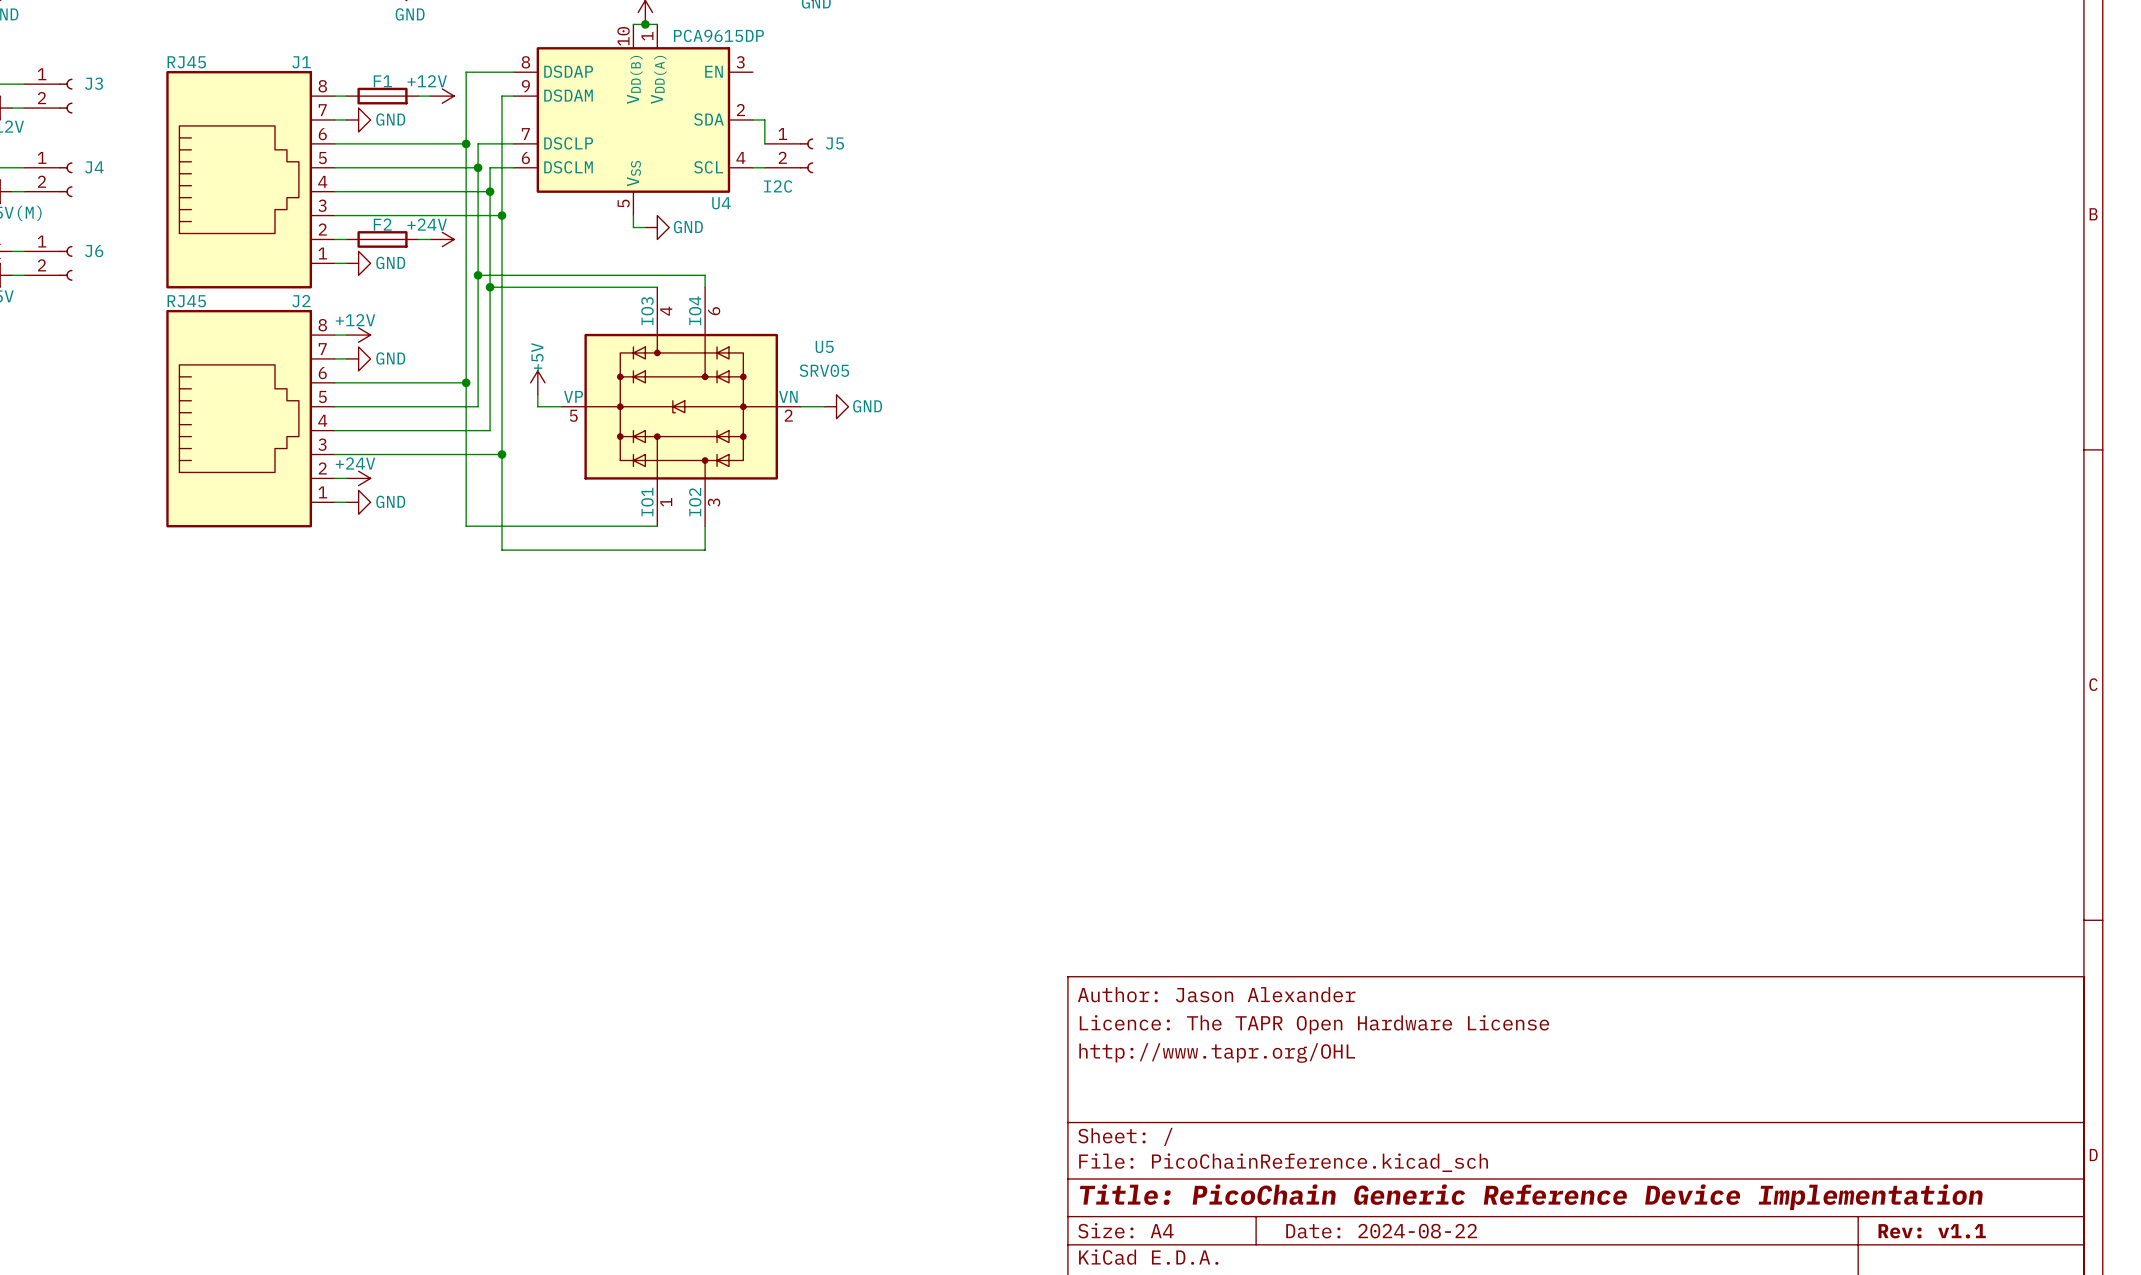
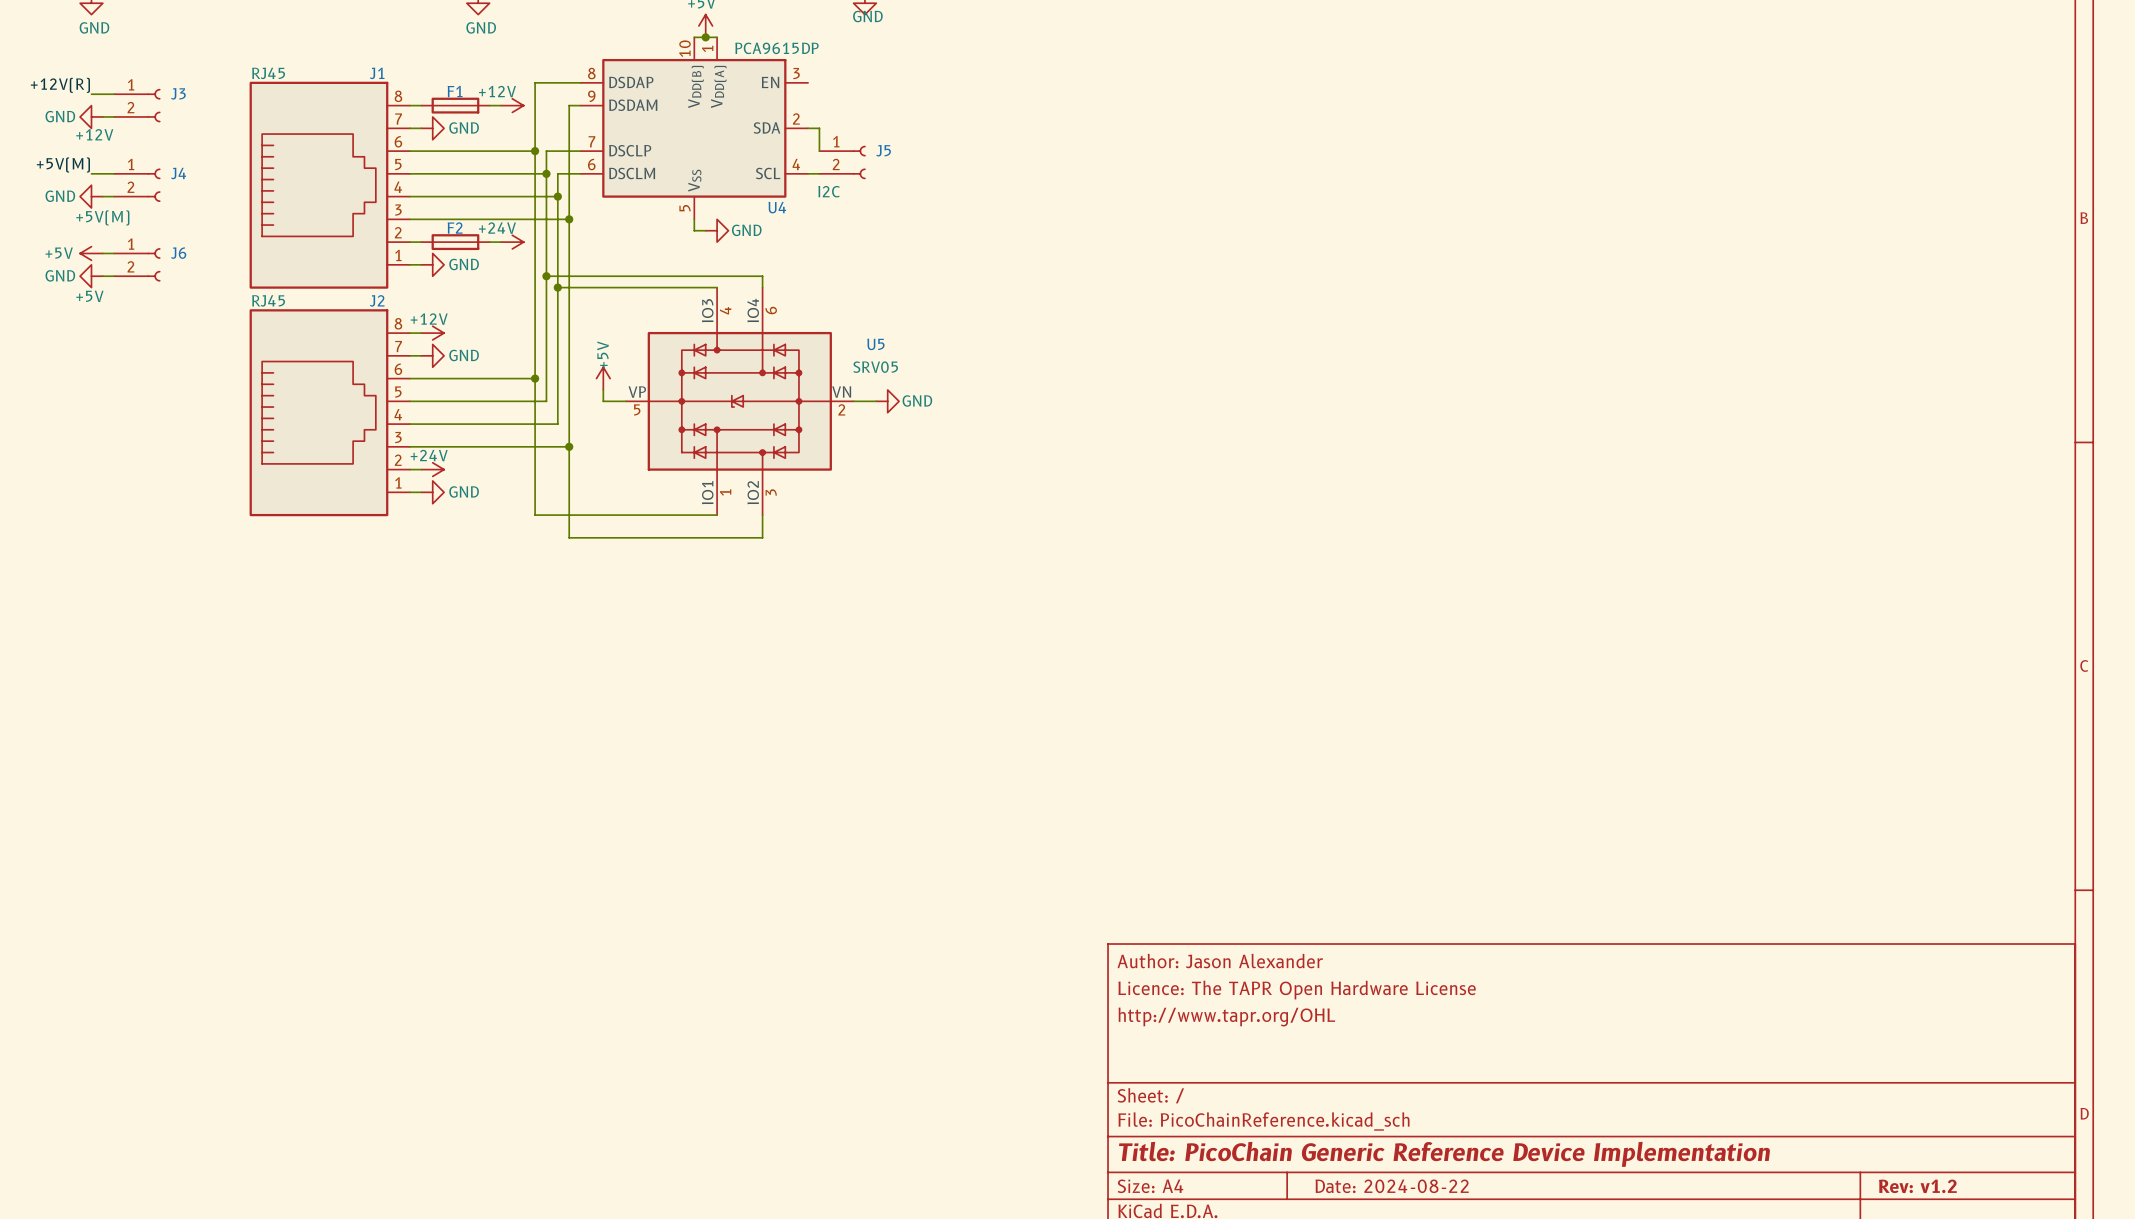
title block: Rev: v1.1 (1932, 1231) -> Rev: v1.2 (1917, 1186)

